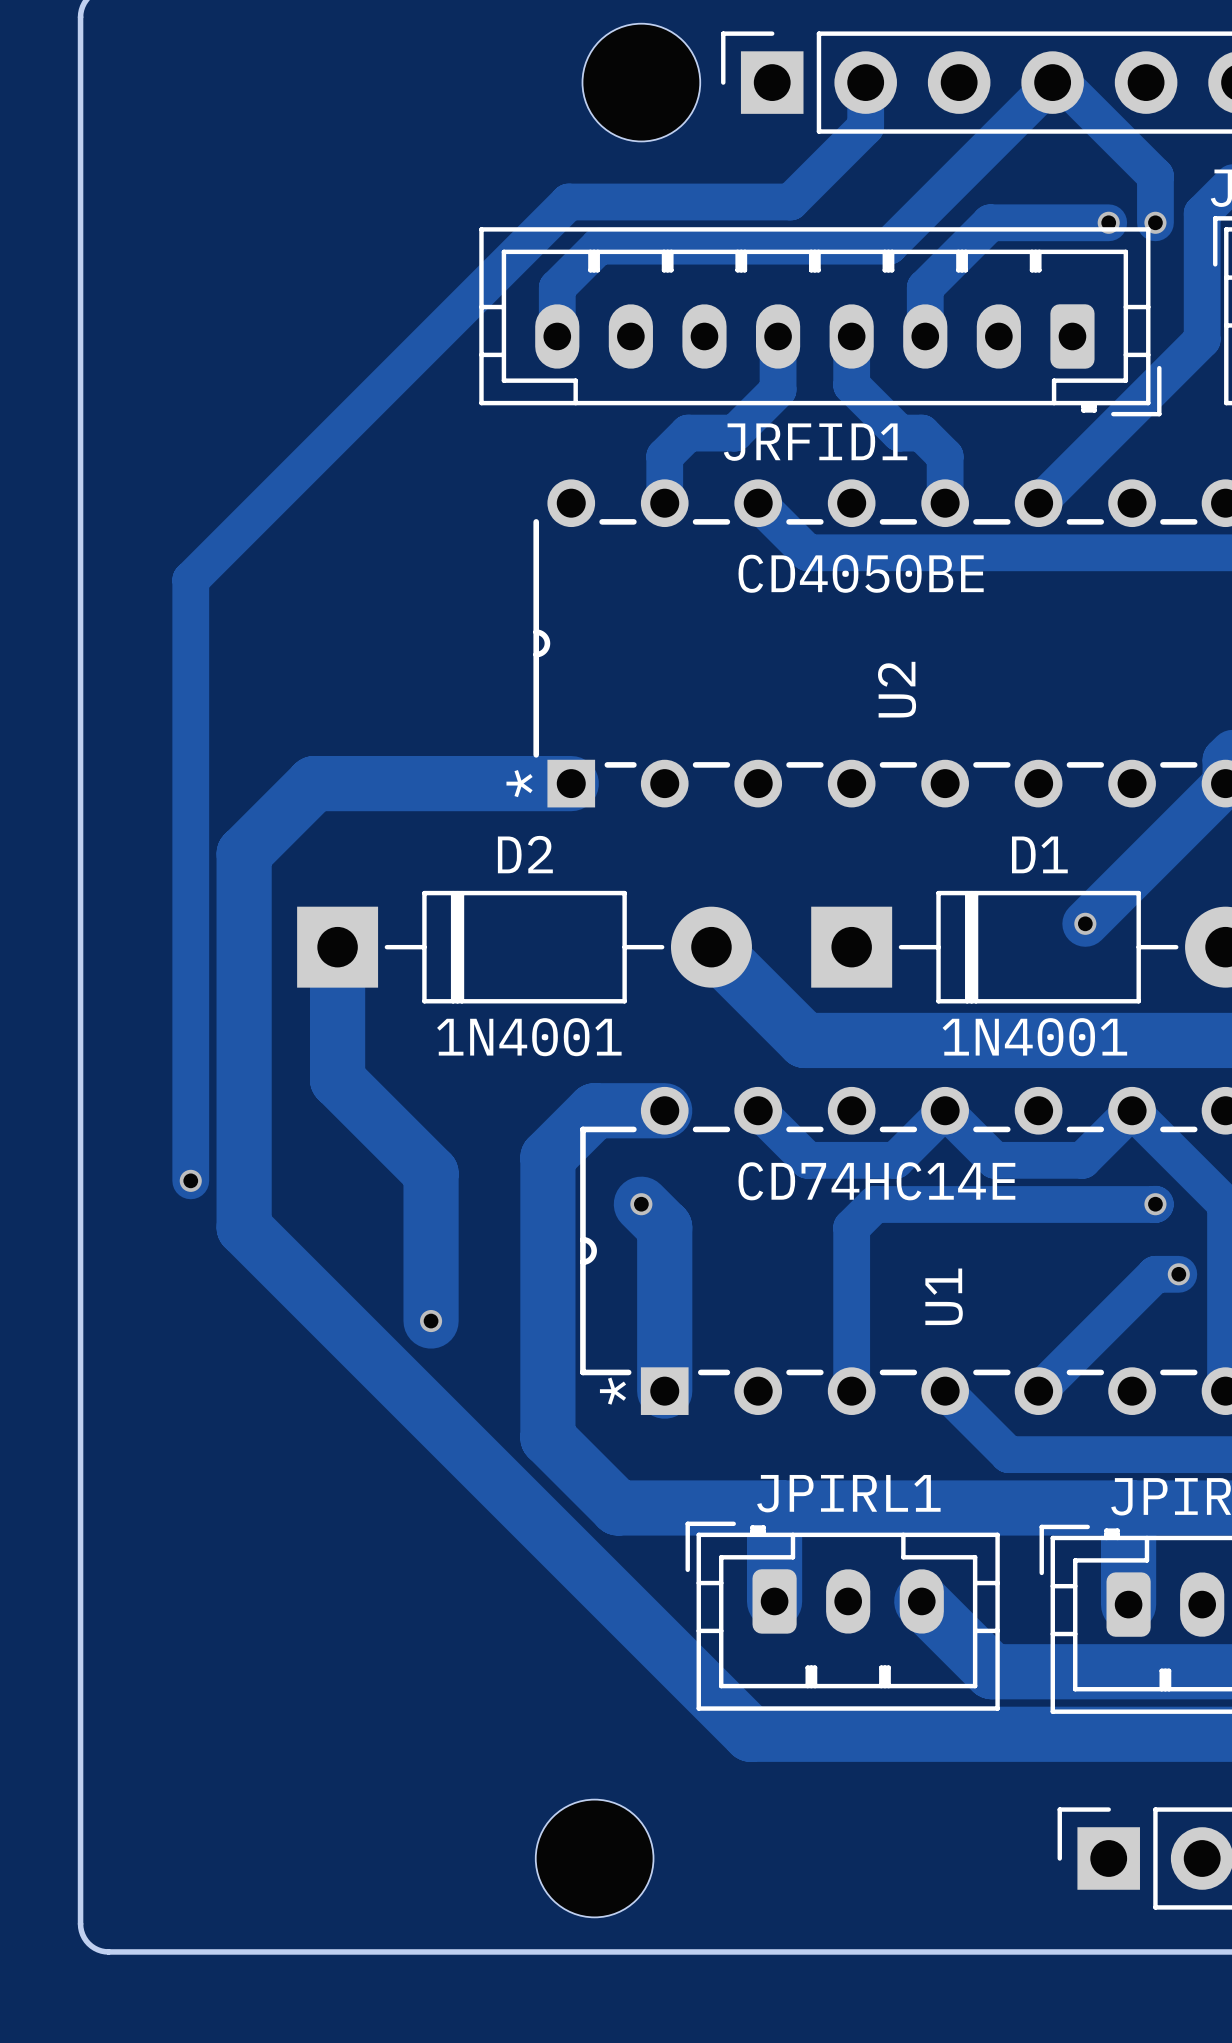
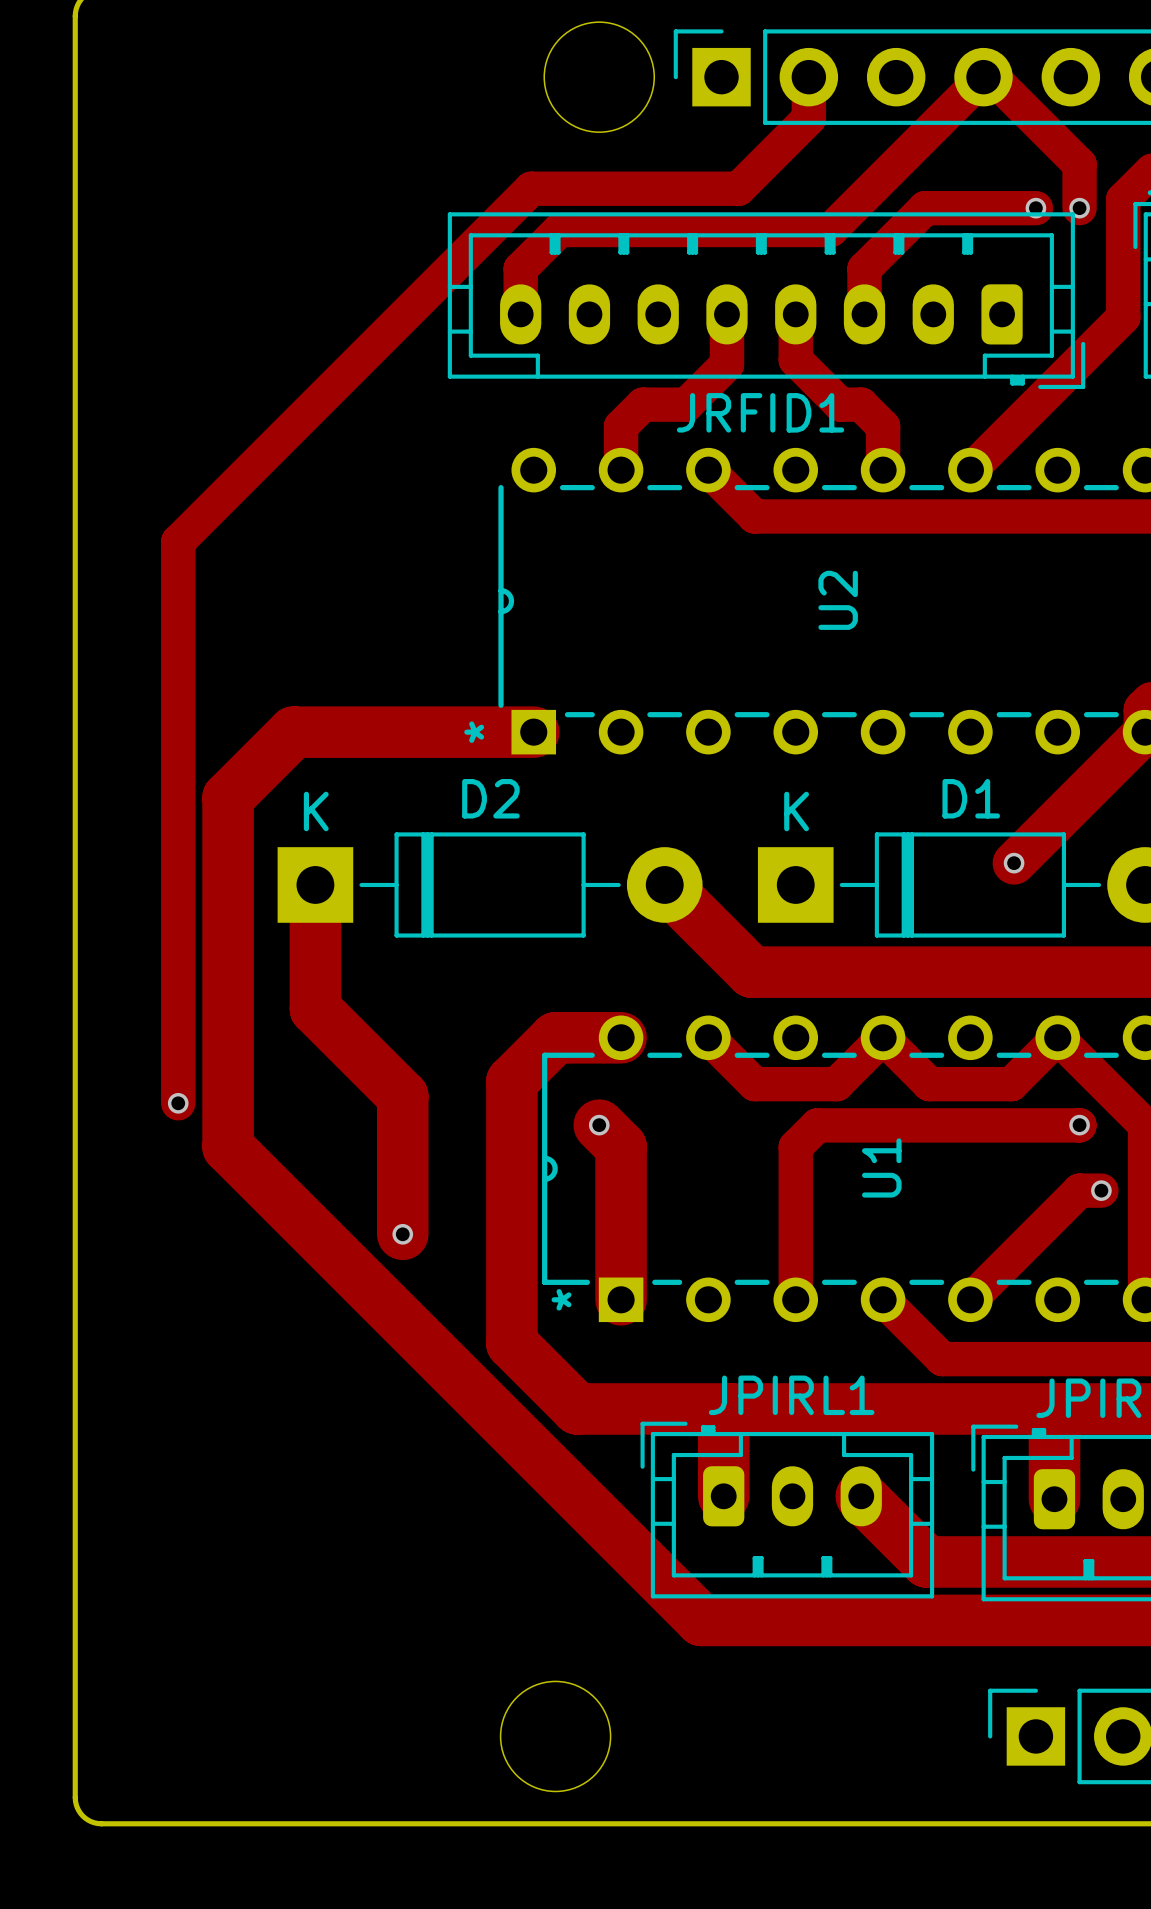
text: CD4050BE (861, 573) -> none
U2 name position: U2 (897, 689) -> U2 (838, 600)
D2 text: none -> K (316, 811)
D1 text: none -> K (796, 811)
D2 text: 1N4001 (529, 1037) -> none
D1 text: 1N4001 (1034, 1037) -> none
text: CD74HC14E (876, 1181) -> none
U1 name position: U1 (944, 1296) -> U1 (881, 1167)

